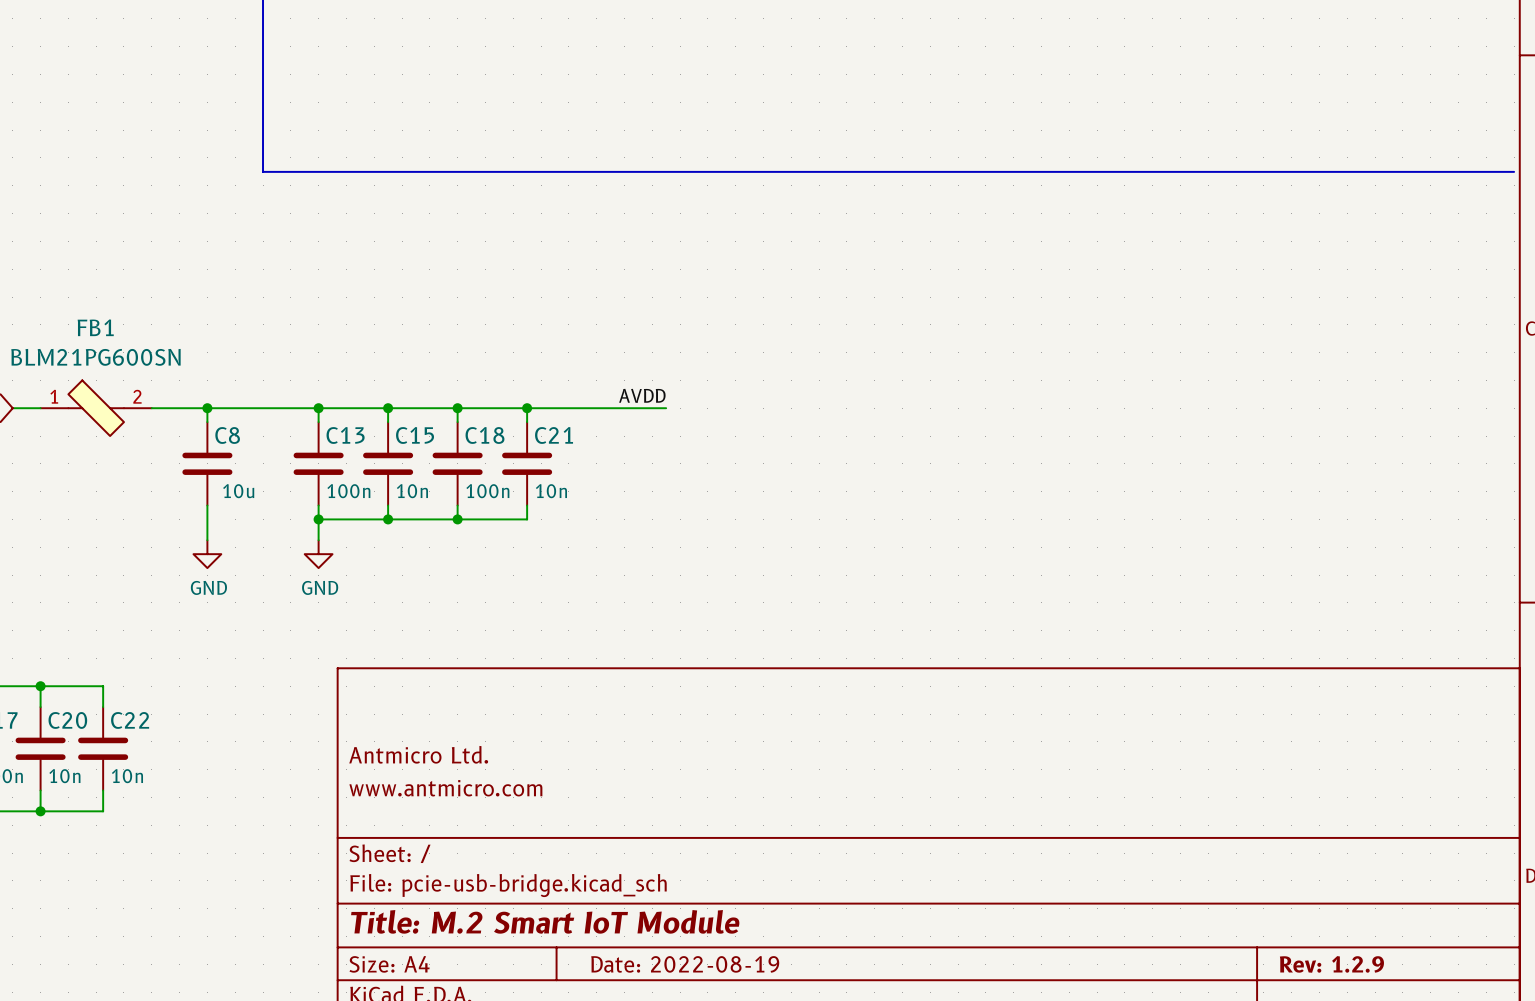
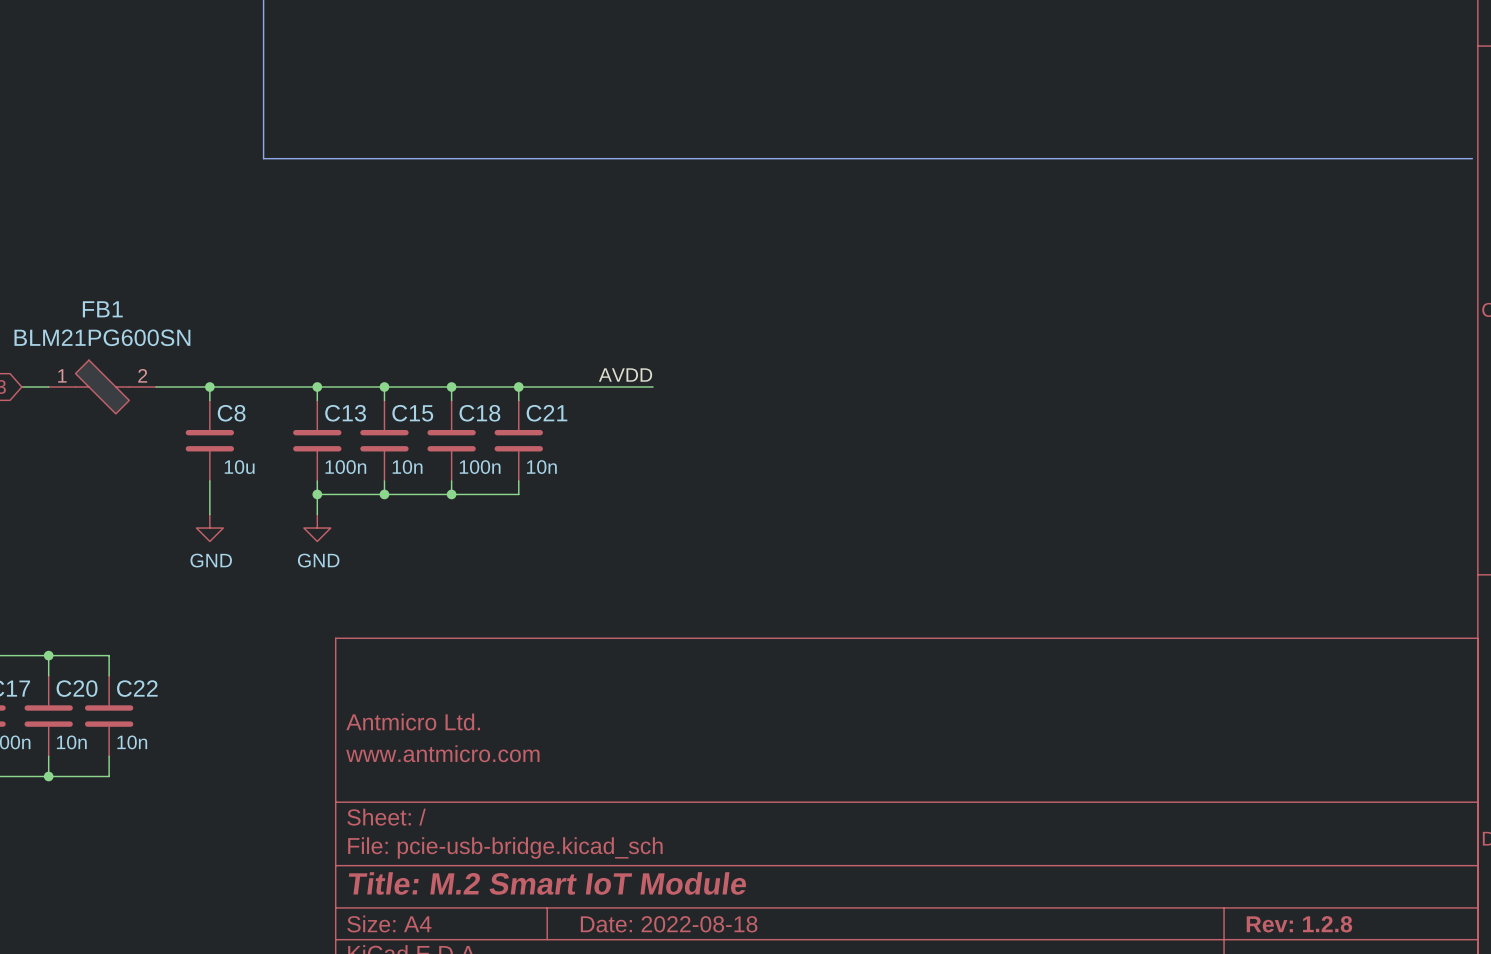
title block: Date: 2022-08-19 (685, 964) -> Date: 2022-08-18 (669, 924)
title block: Rev: 1.2.9 (1331, 964) -> Rev: 1.2.8 (1299, 924)

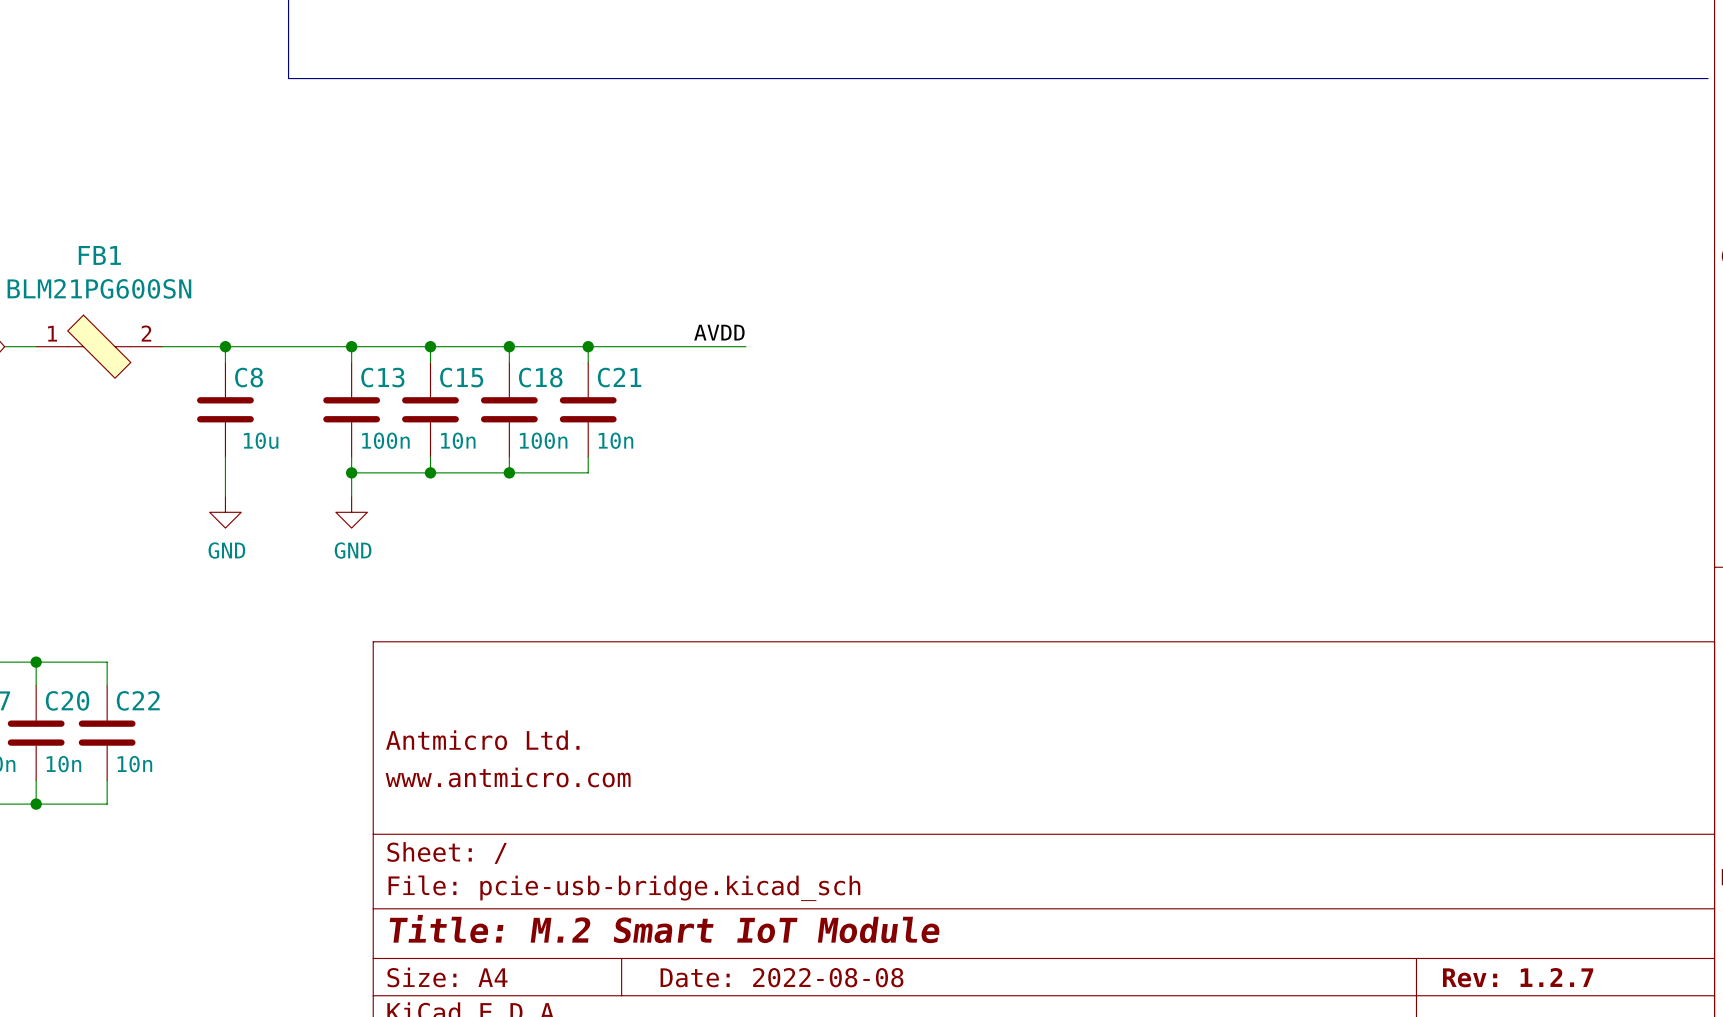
title block: Date: 2022-08-18 (669, 924) -> Date: 2022-08-08 (781, 977)
title block: Rev: 1.2.8 (1299, 924) -> Rev: 1.2.7 (1518, 977)

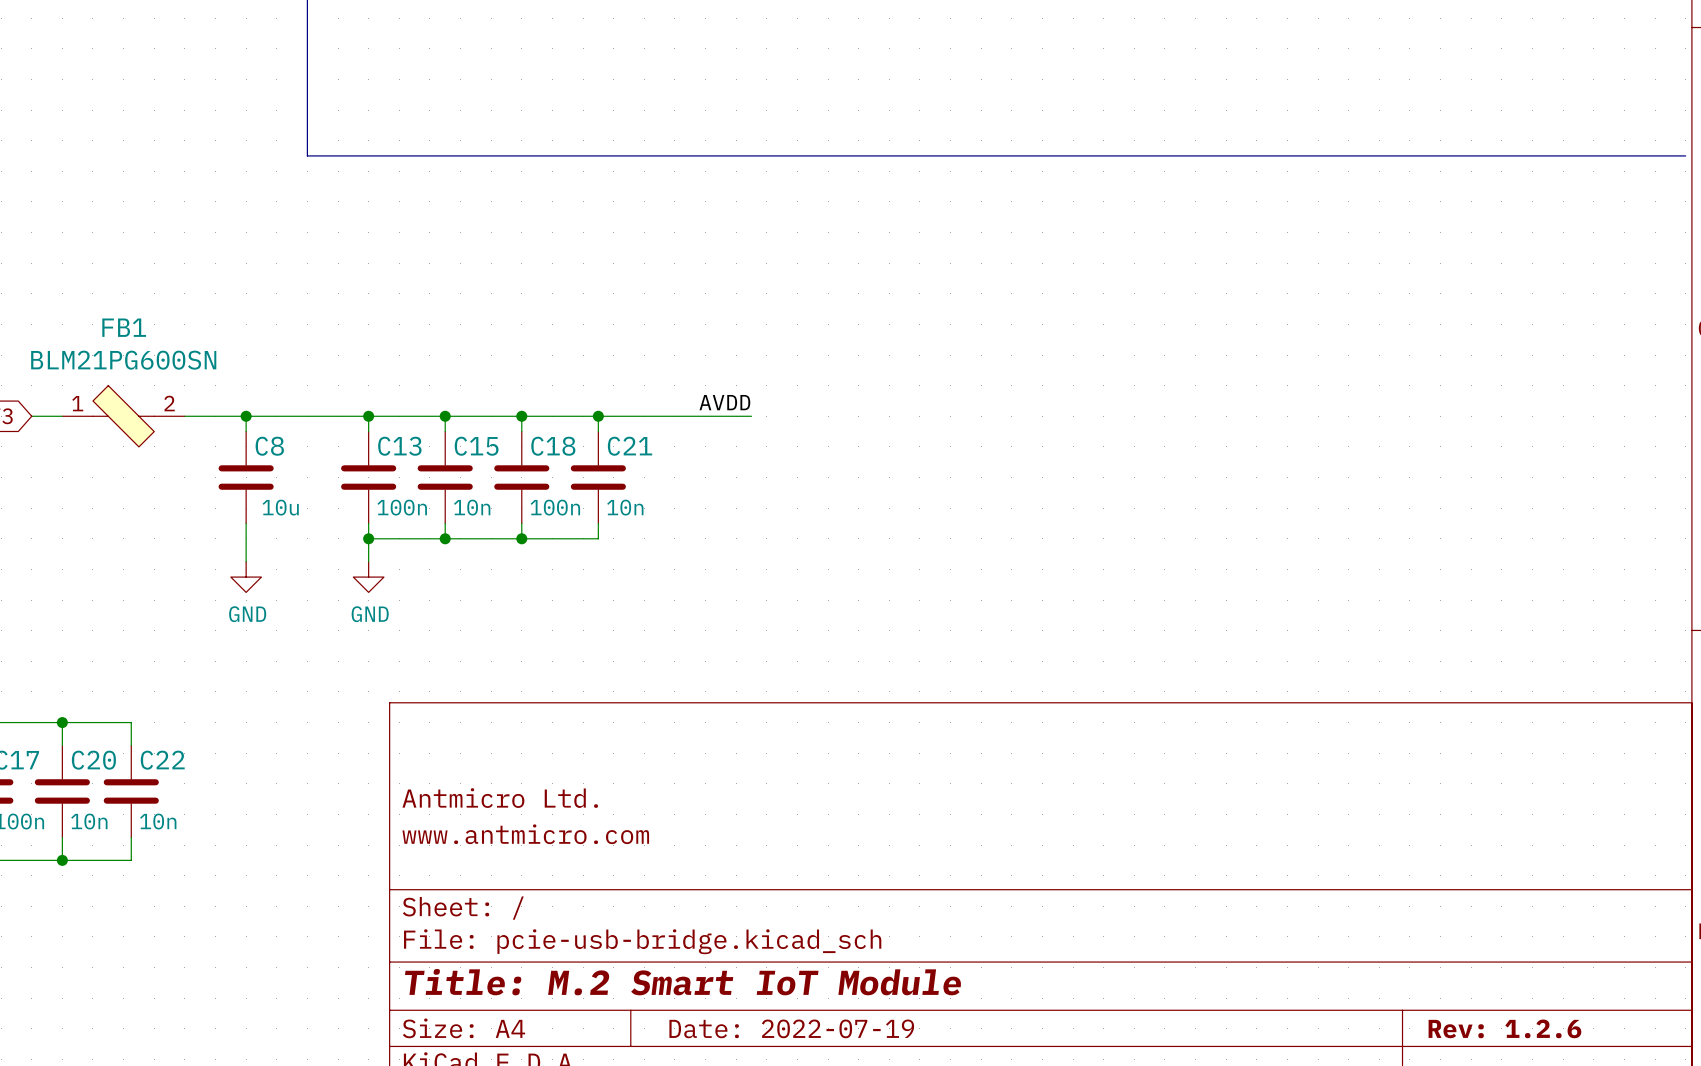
title block: Date: 2022-08-08 (781, 977) -> Date: 2022-07-19 (791, 1028)
title block: Rev: 1.2.7 (1518, 977) -> Rev: 1.2.6 (1504, 1028)

